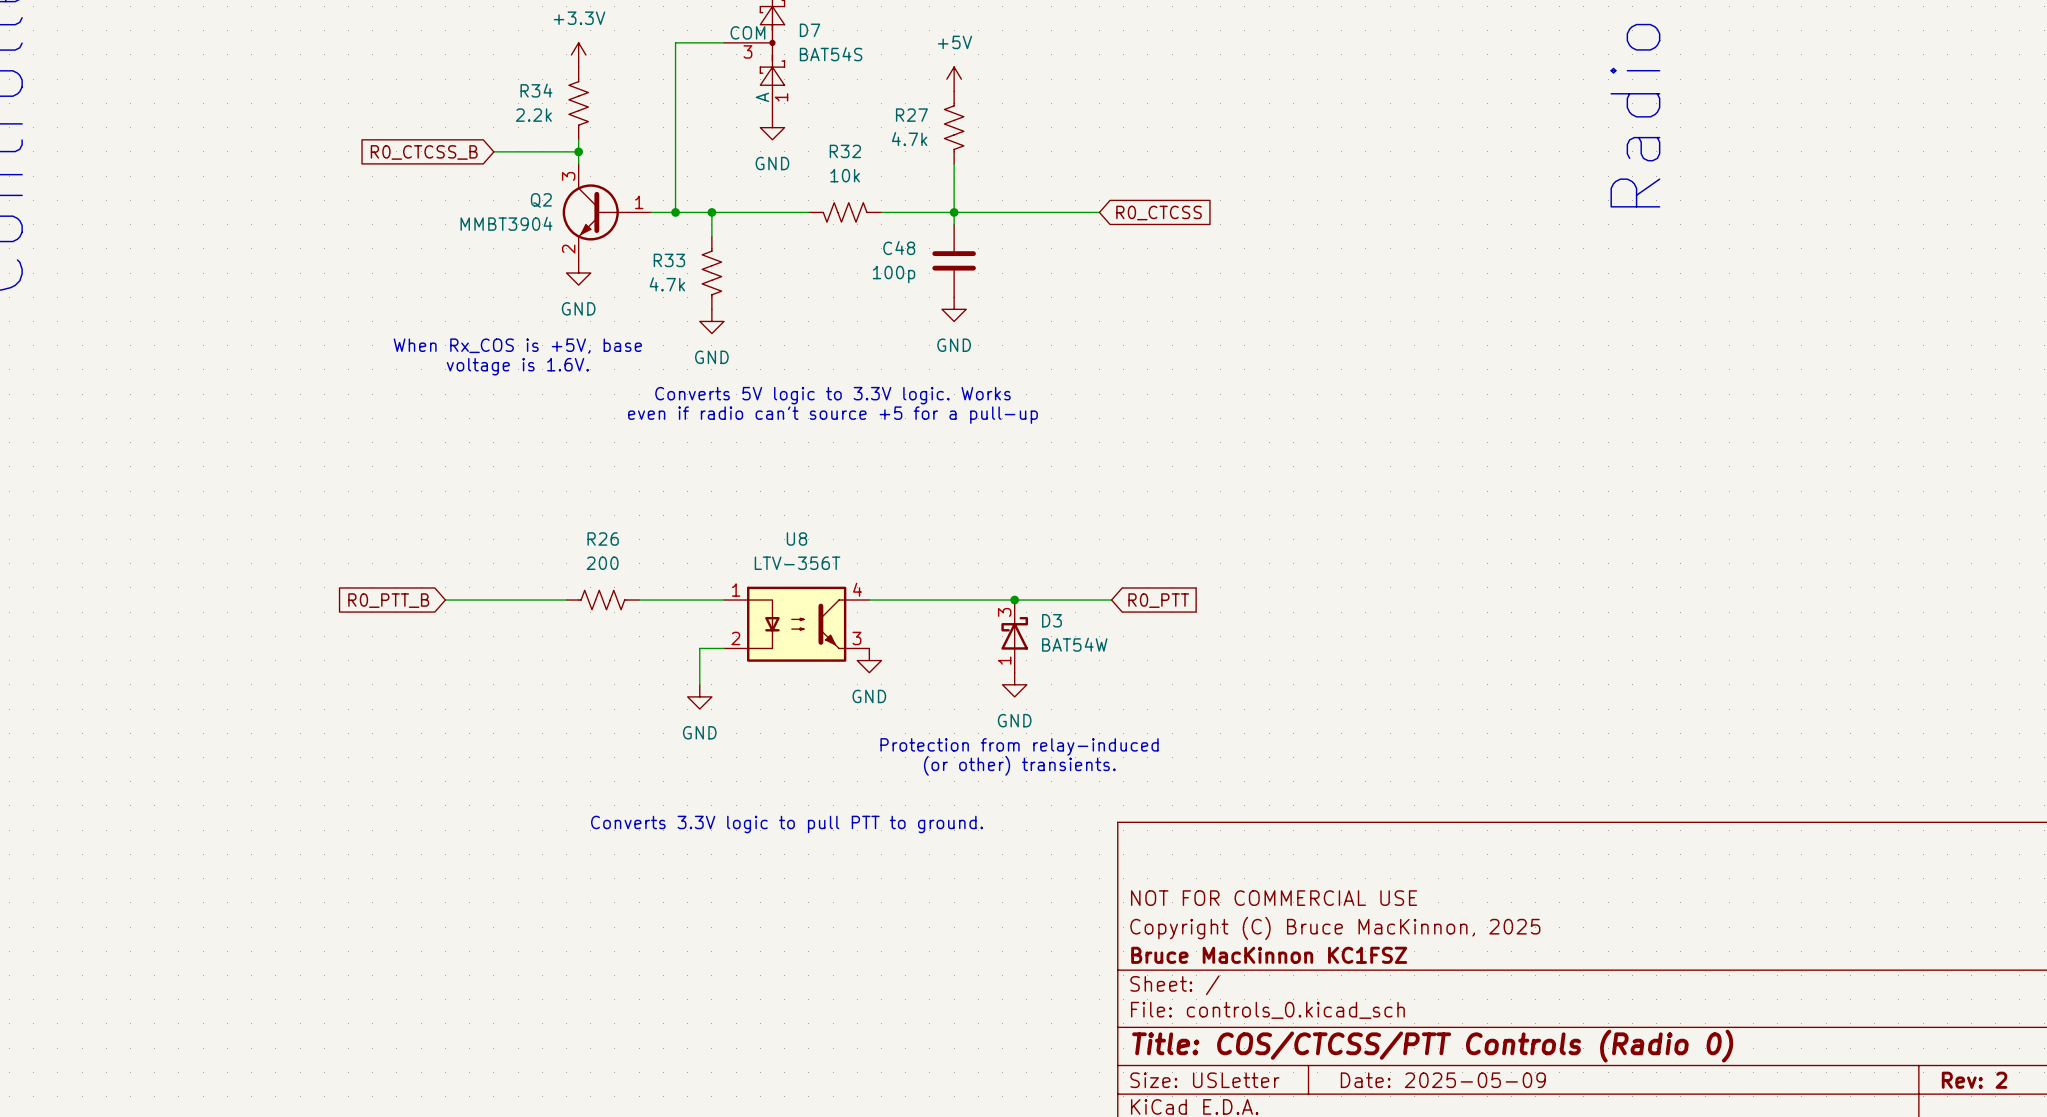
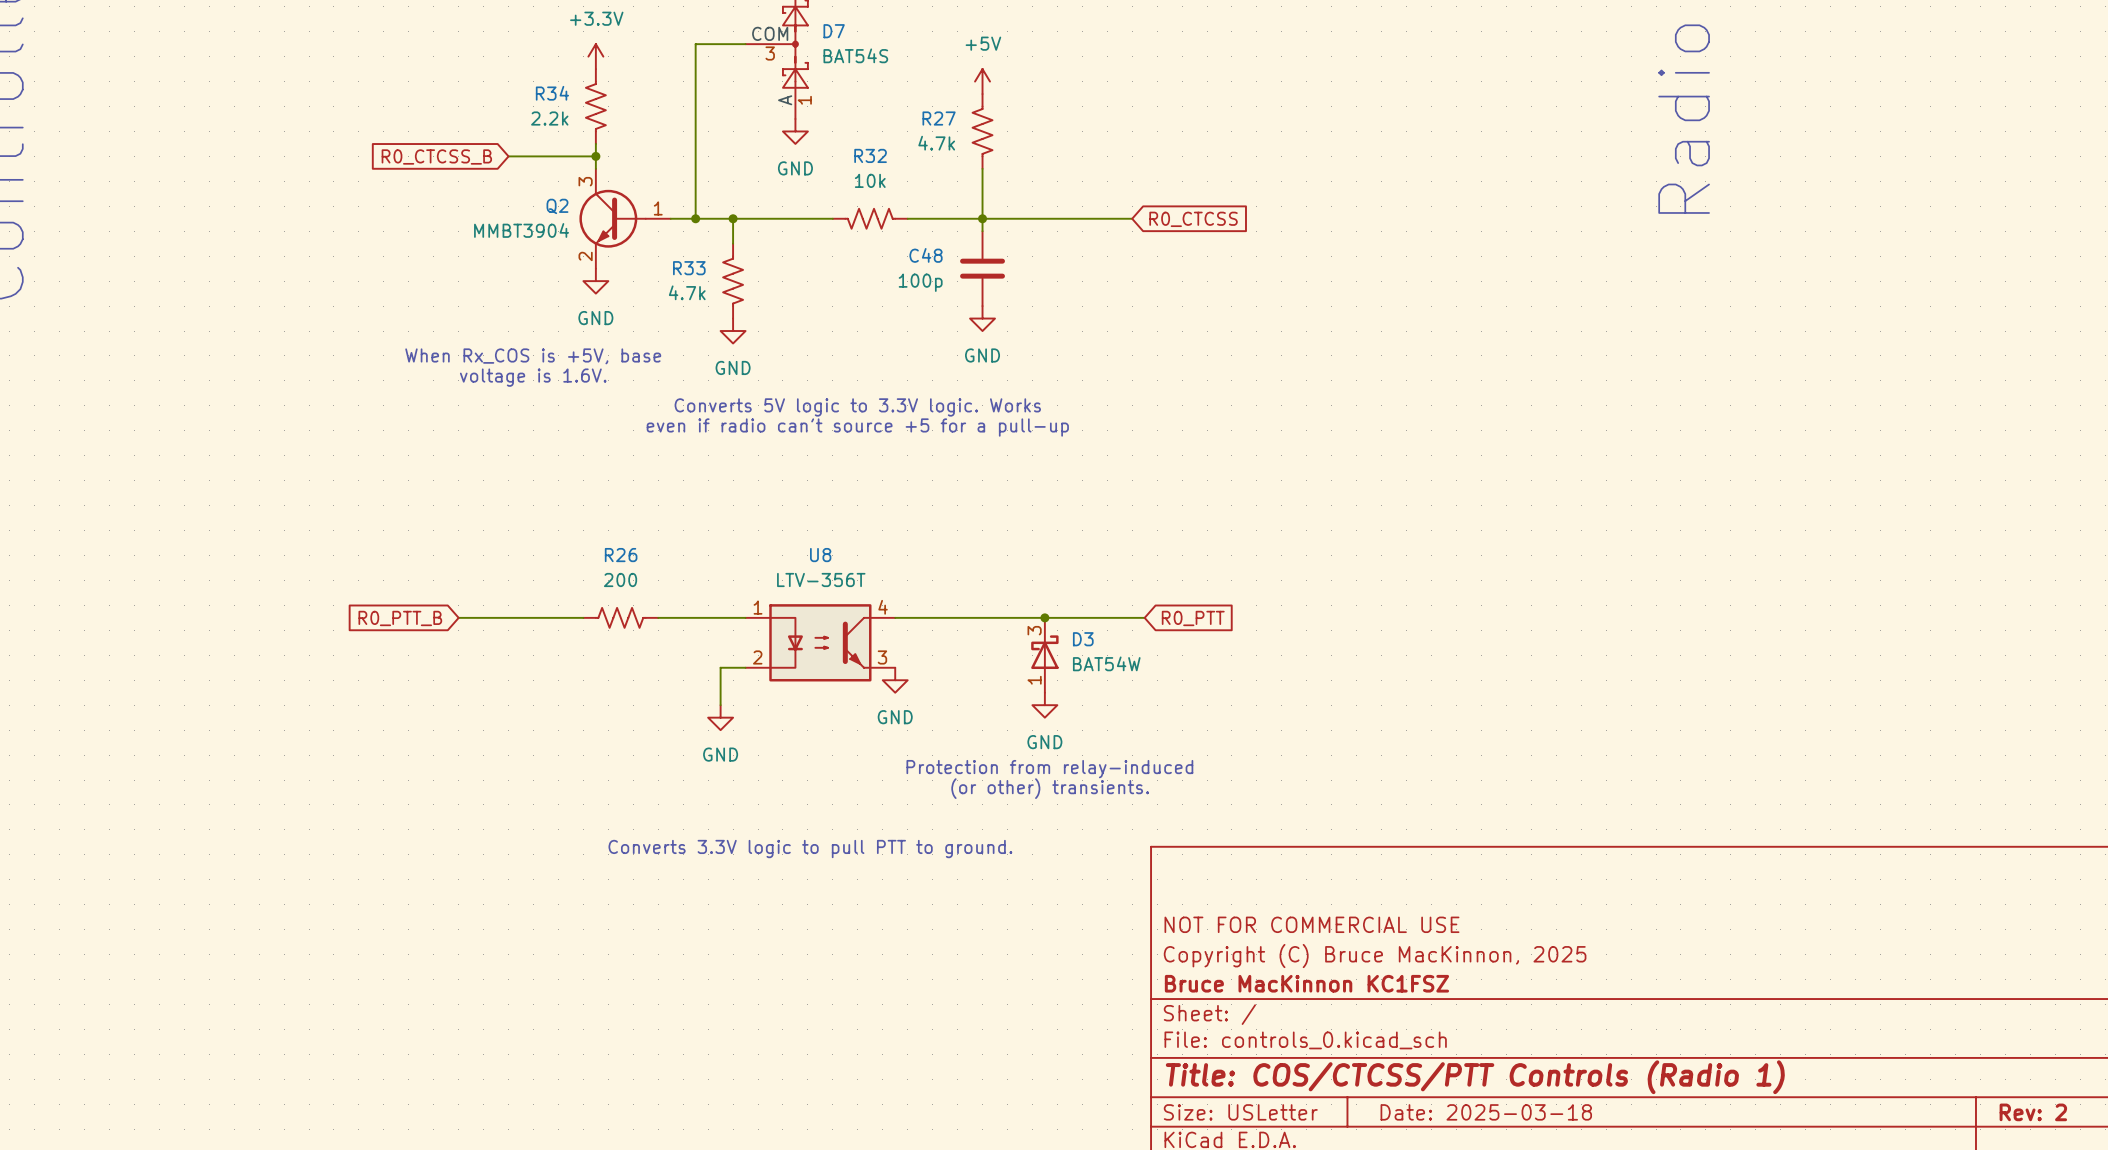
title block: Title: COS/CTCSS/PTT Controls (Radio 0) (1432, 1046) -> Title: COS/CTCSS/PTT Controls (Radio 1) (1475, 1077)
title block: Date: 2025-05-09 (1443, 1080) -> Date: 2025-03-18 (1486, 1112)

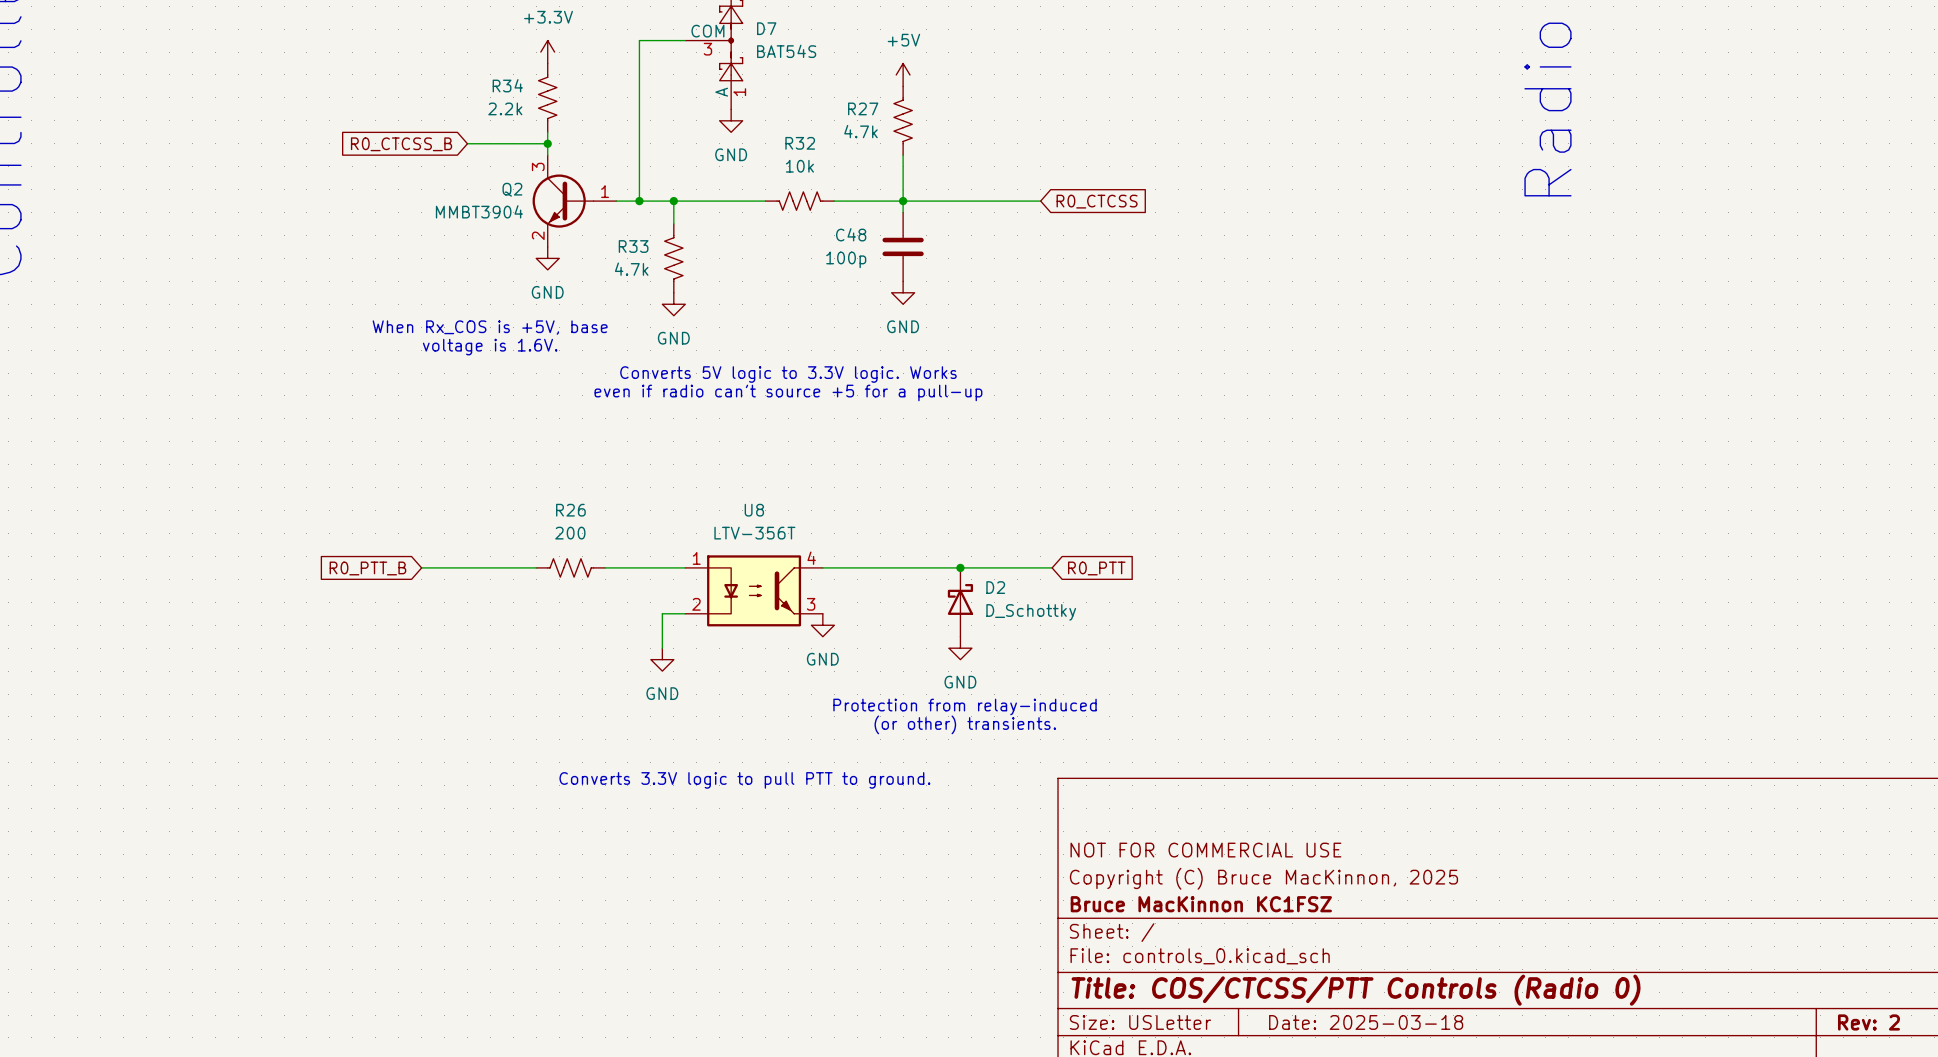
D3 pin number: 3 (1034, 630) -> none
D3 name: D3 (1083, 639) -> D2 (995, 587)
D3 value: BAT54W (1106, 663) -> D_Schottky (1031, 612)
D3 pin number: 1 (1034, 680) -> none
title block: Title: COS/CTCSS/PTT Controls (Radio 1) (1475, 1077) -> Title: COS/CTCSS/PTT Controls (Radio 0) (1356, 990)

